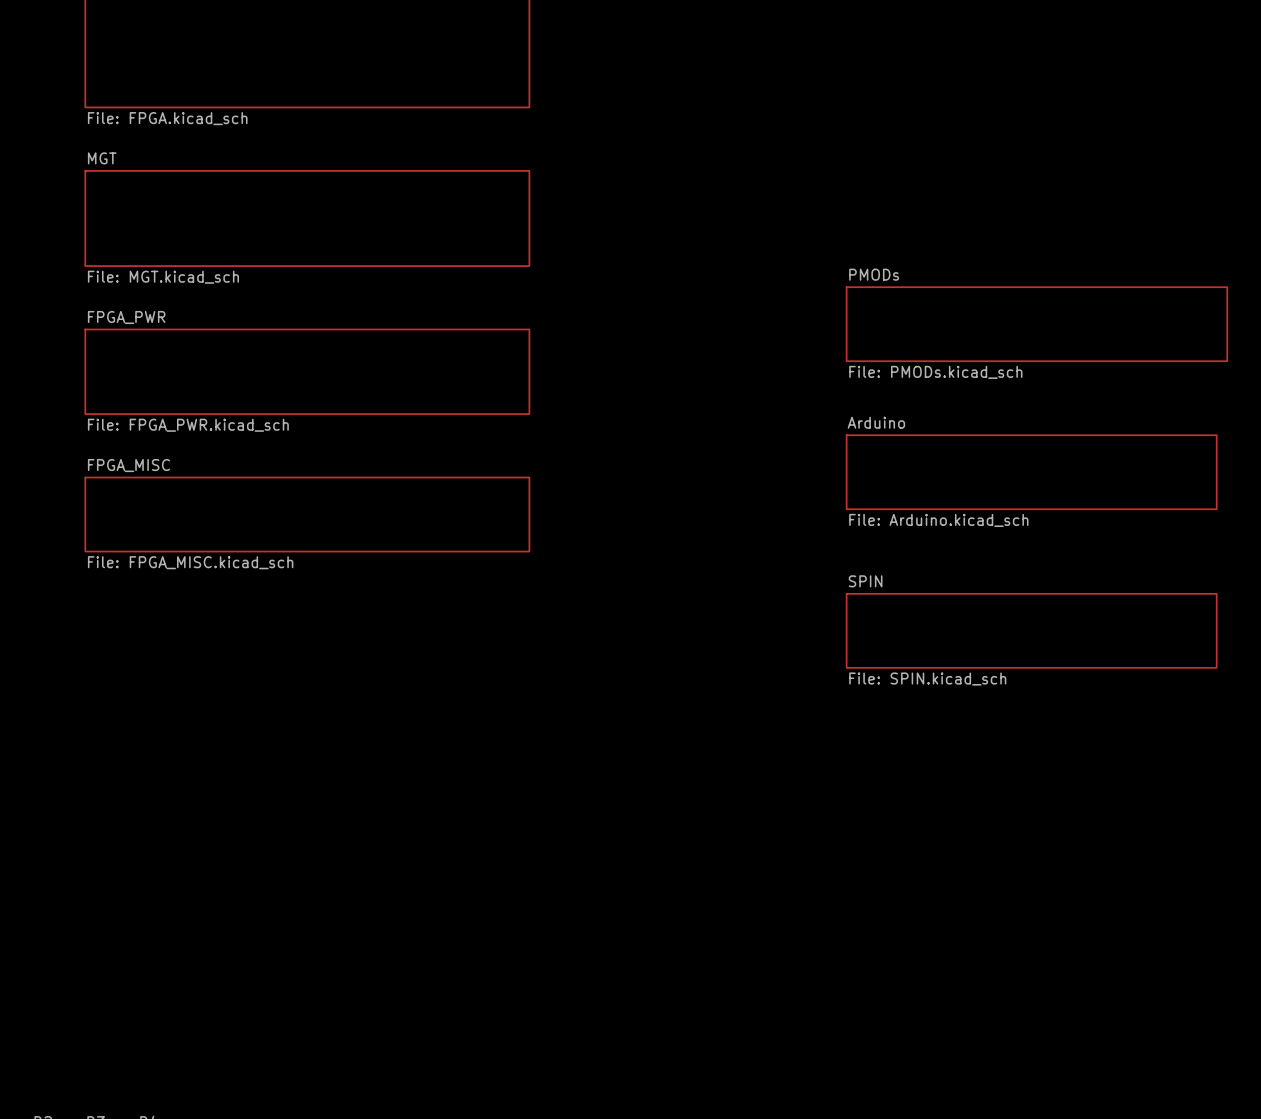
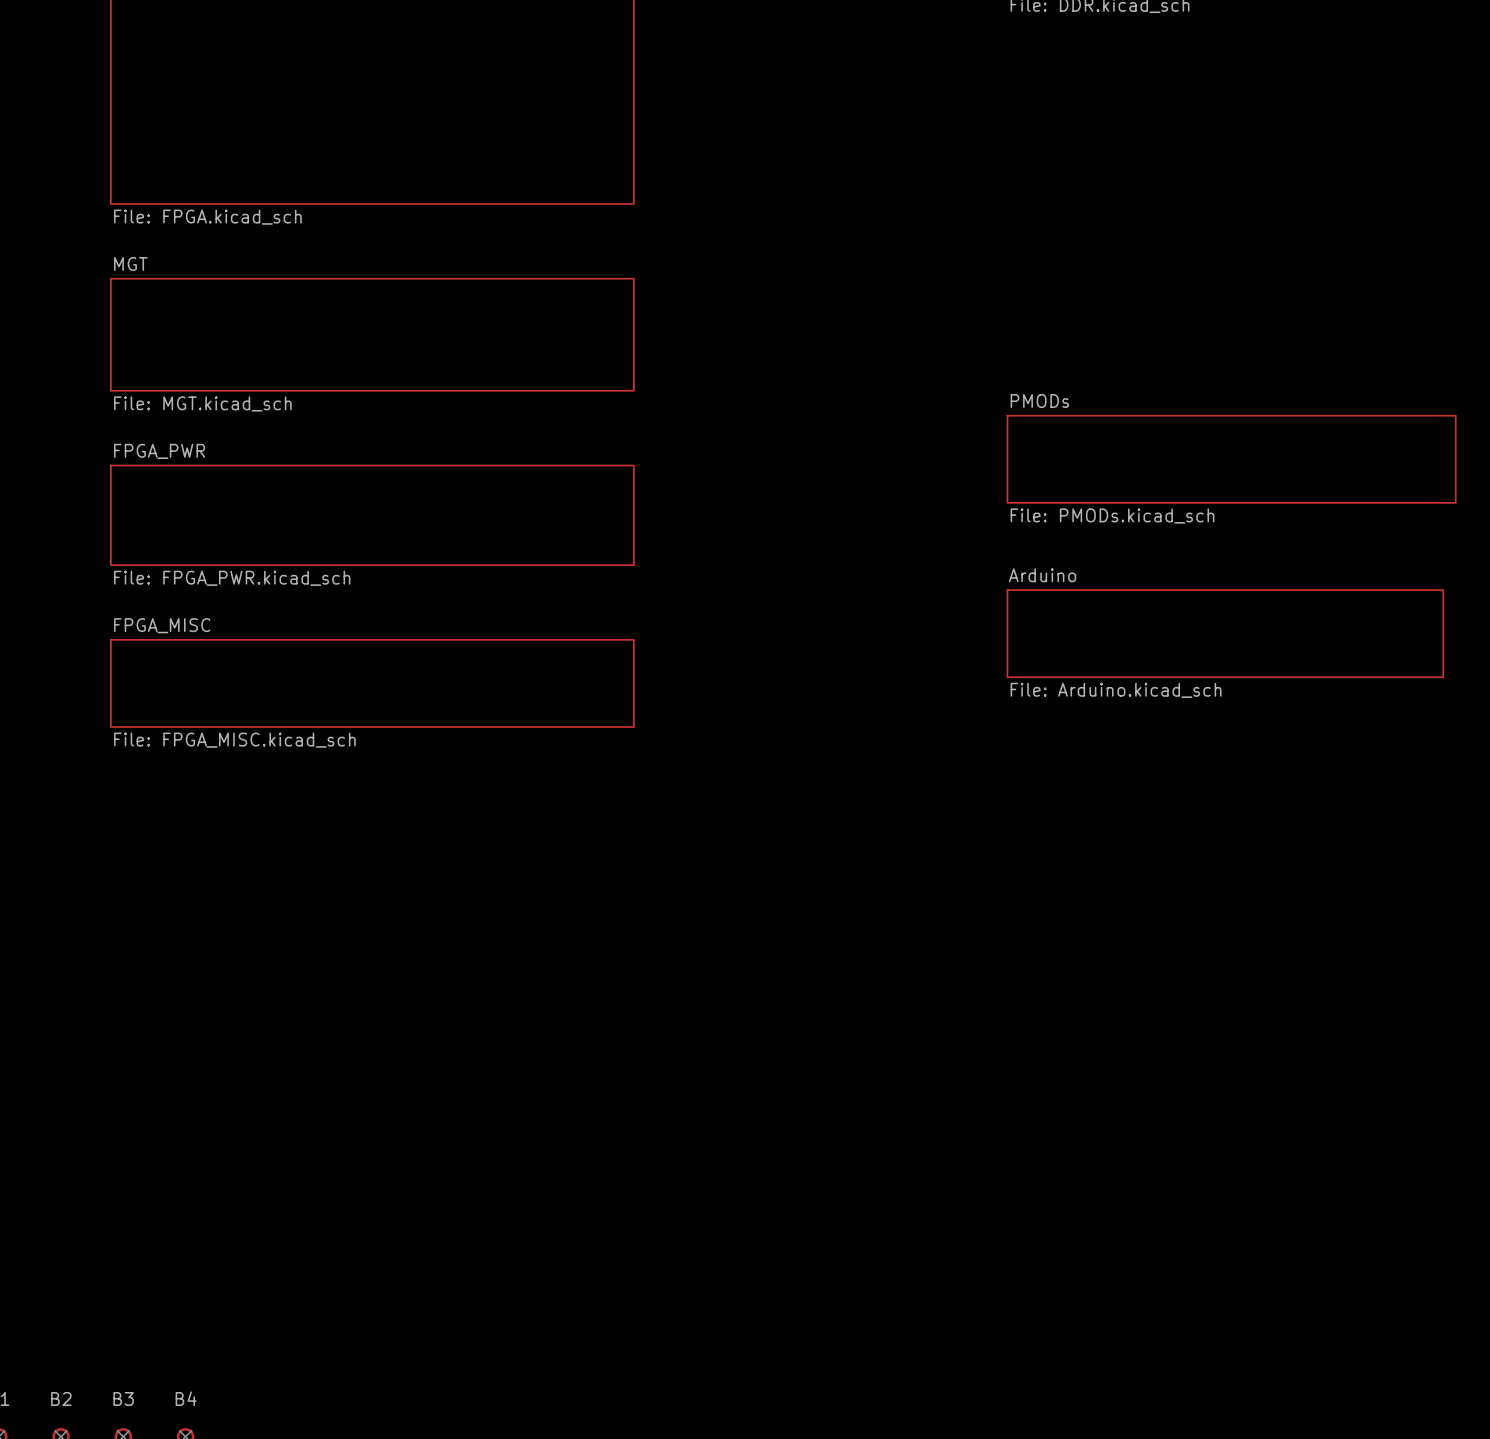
sheet SPIN: File: SPIN.kicad_sch (1031, 630) -> none

